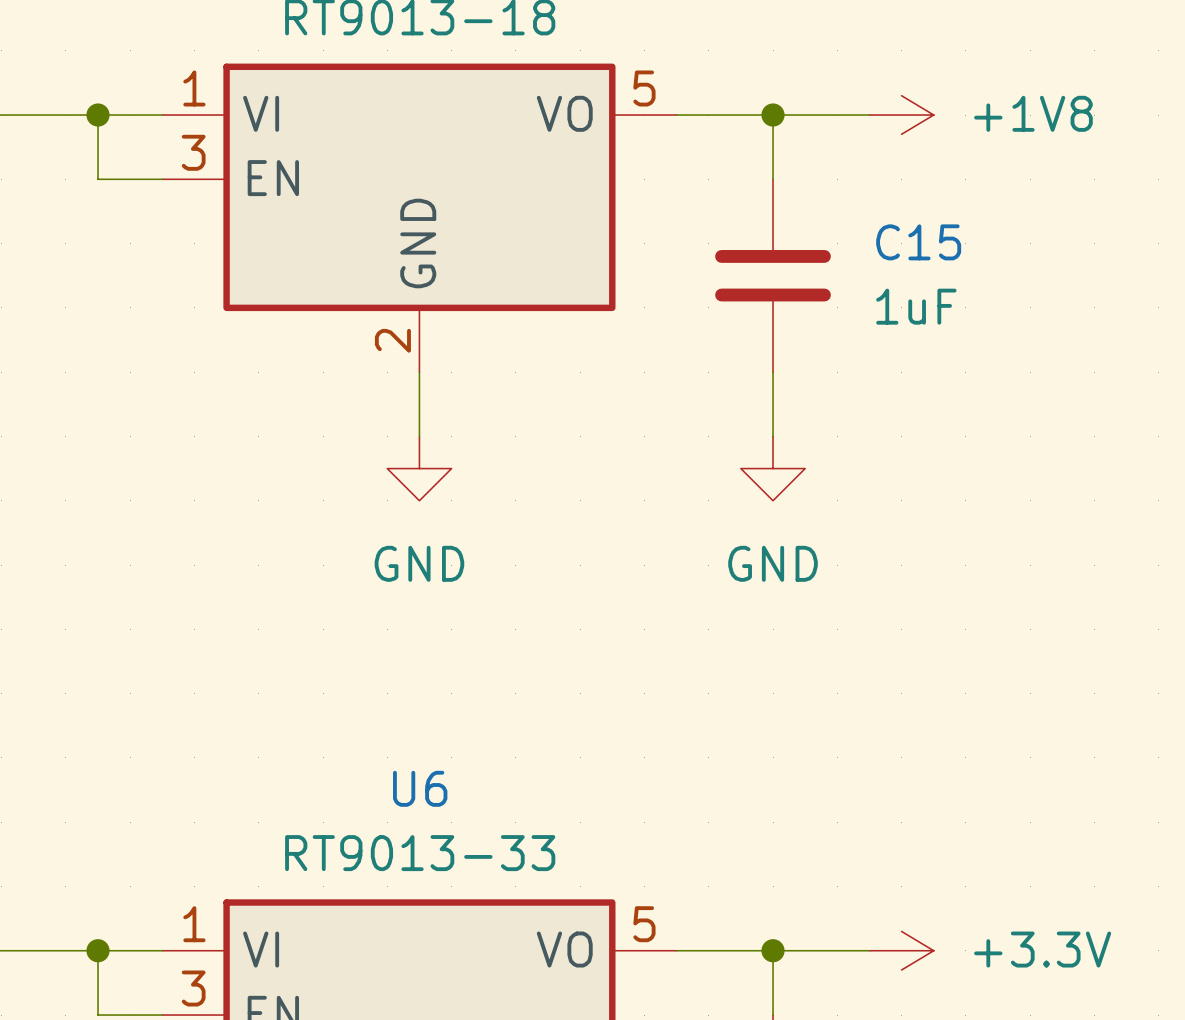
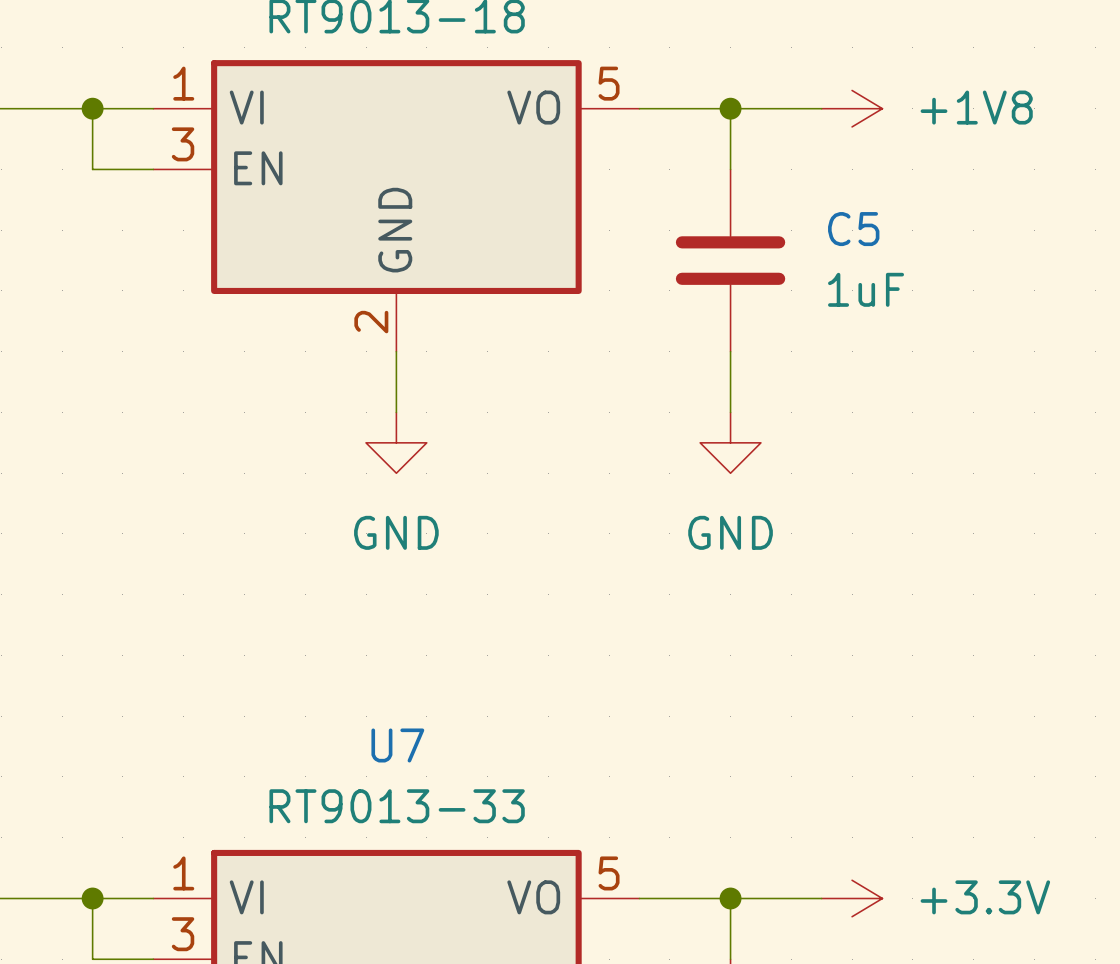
C15 name: C15 (918, 242) -> C5 (853, 229)
U6 name: U6 (420, 788) -> U7 (397, 745)

